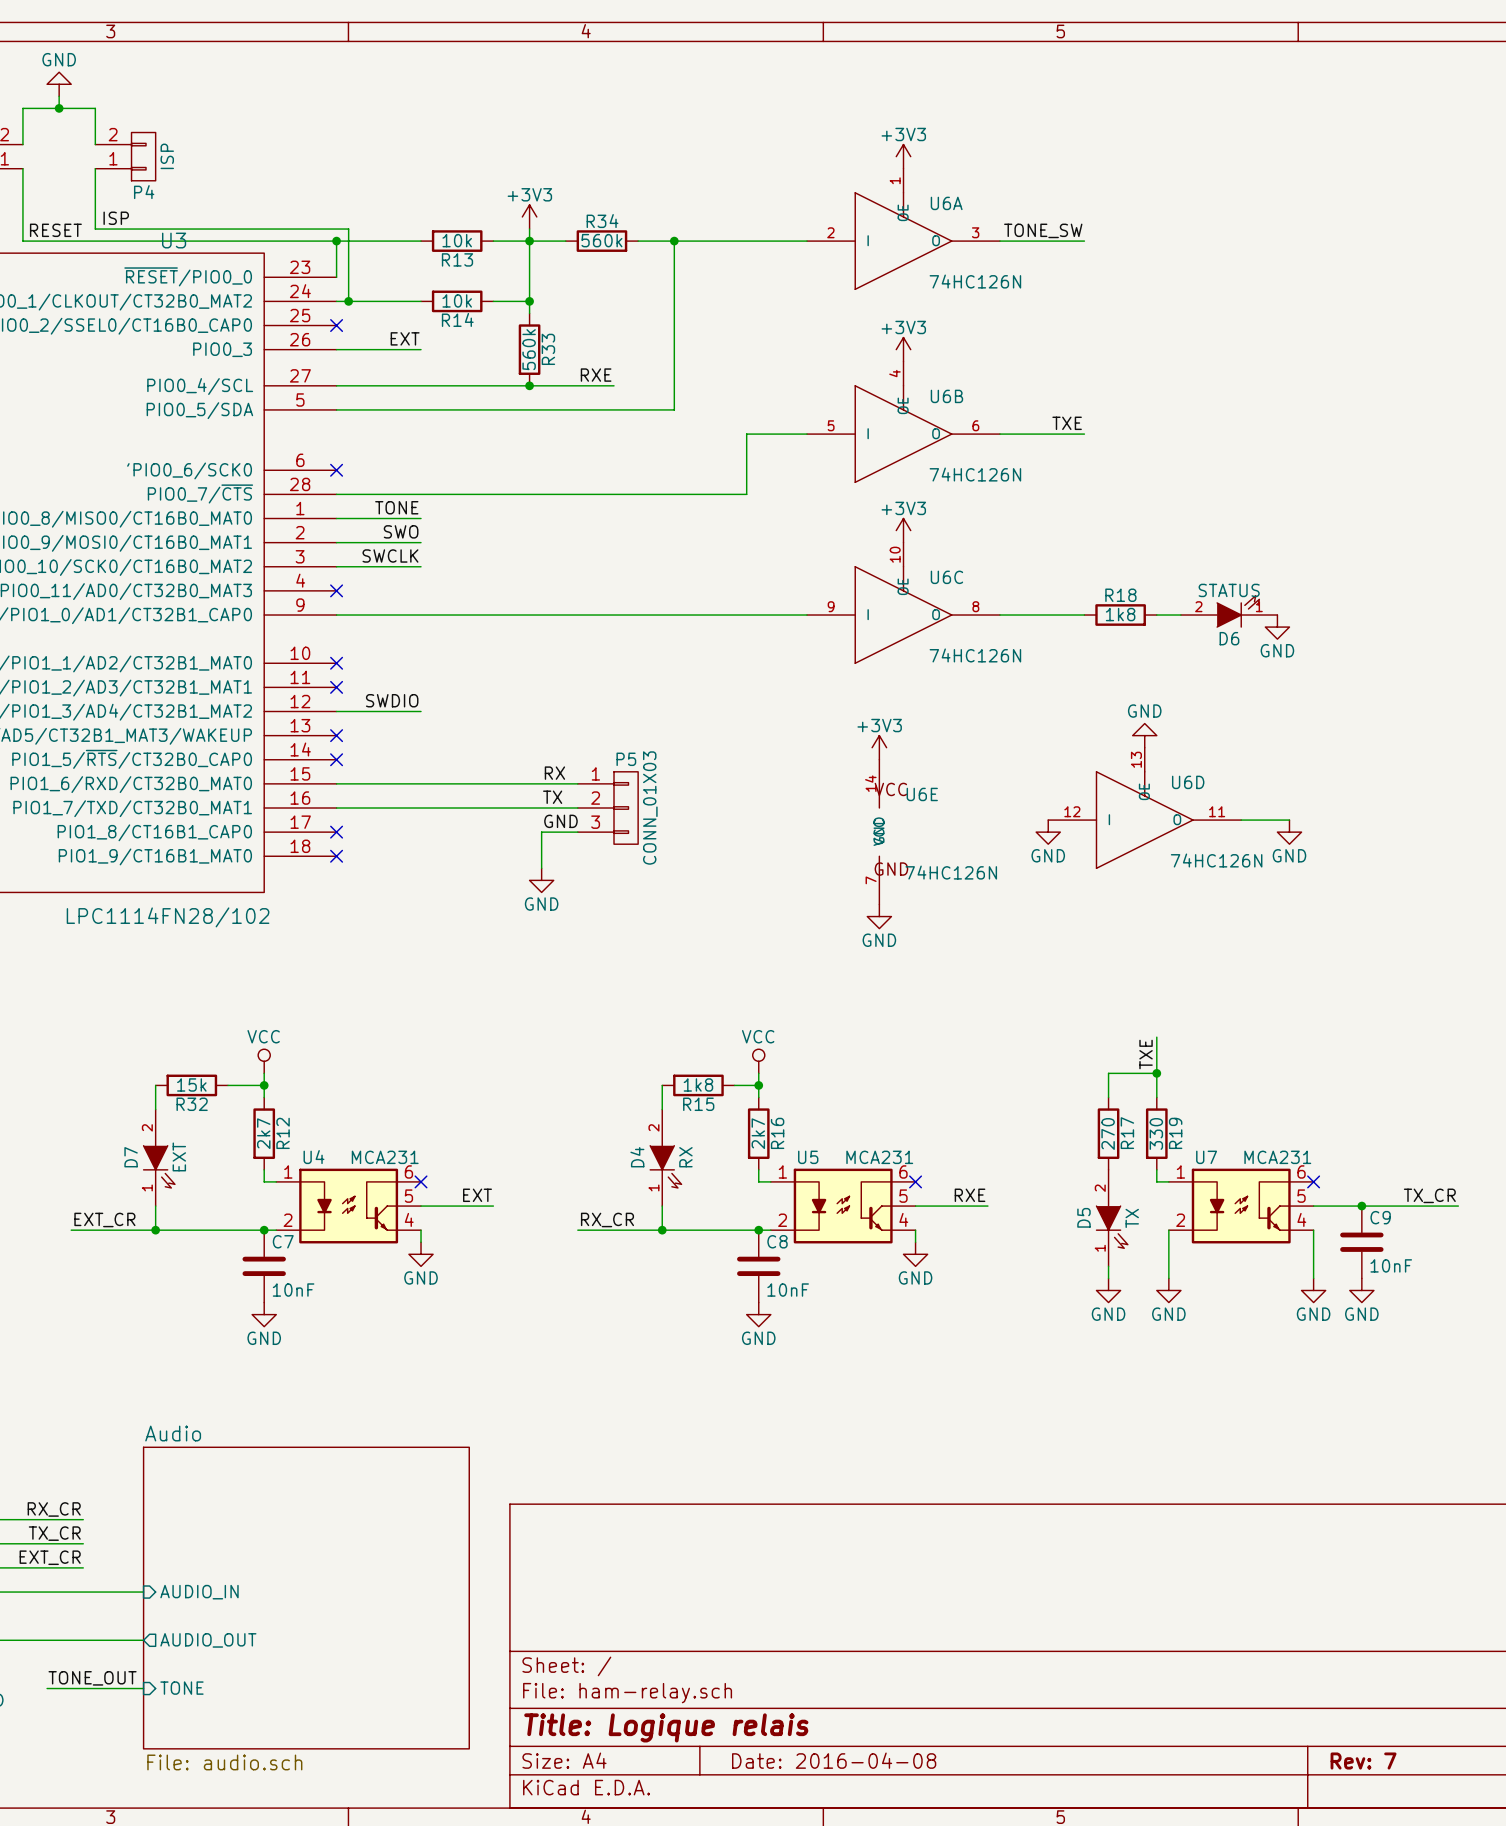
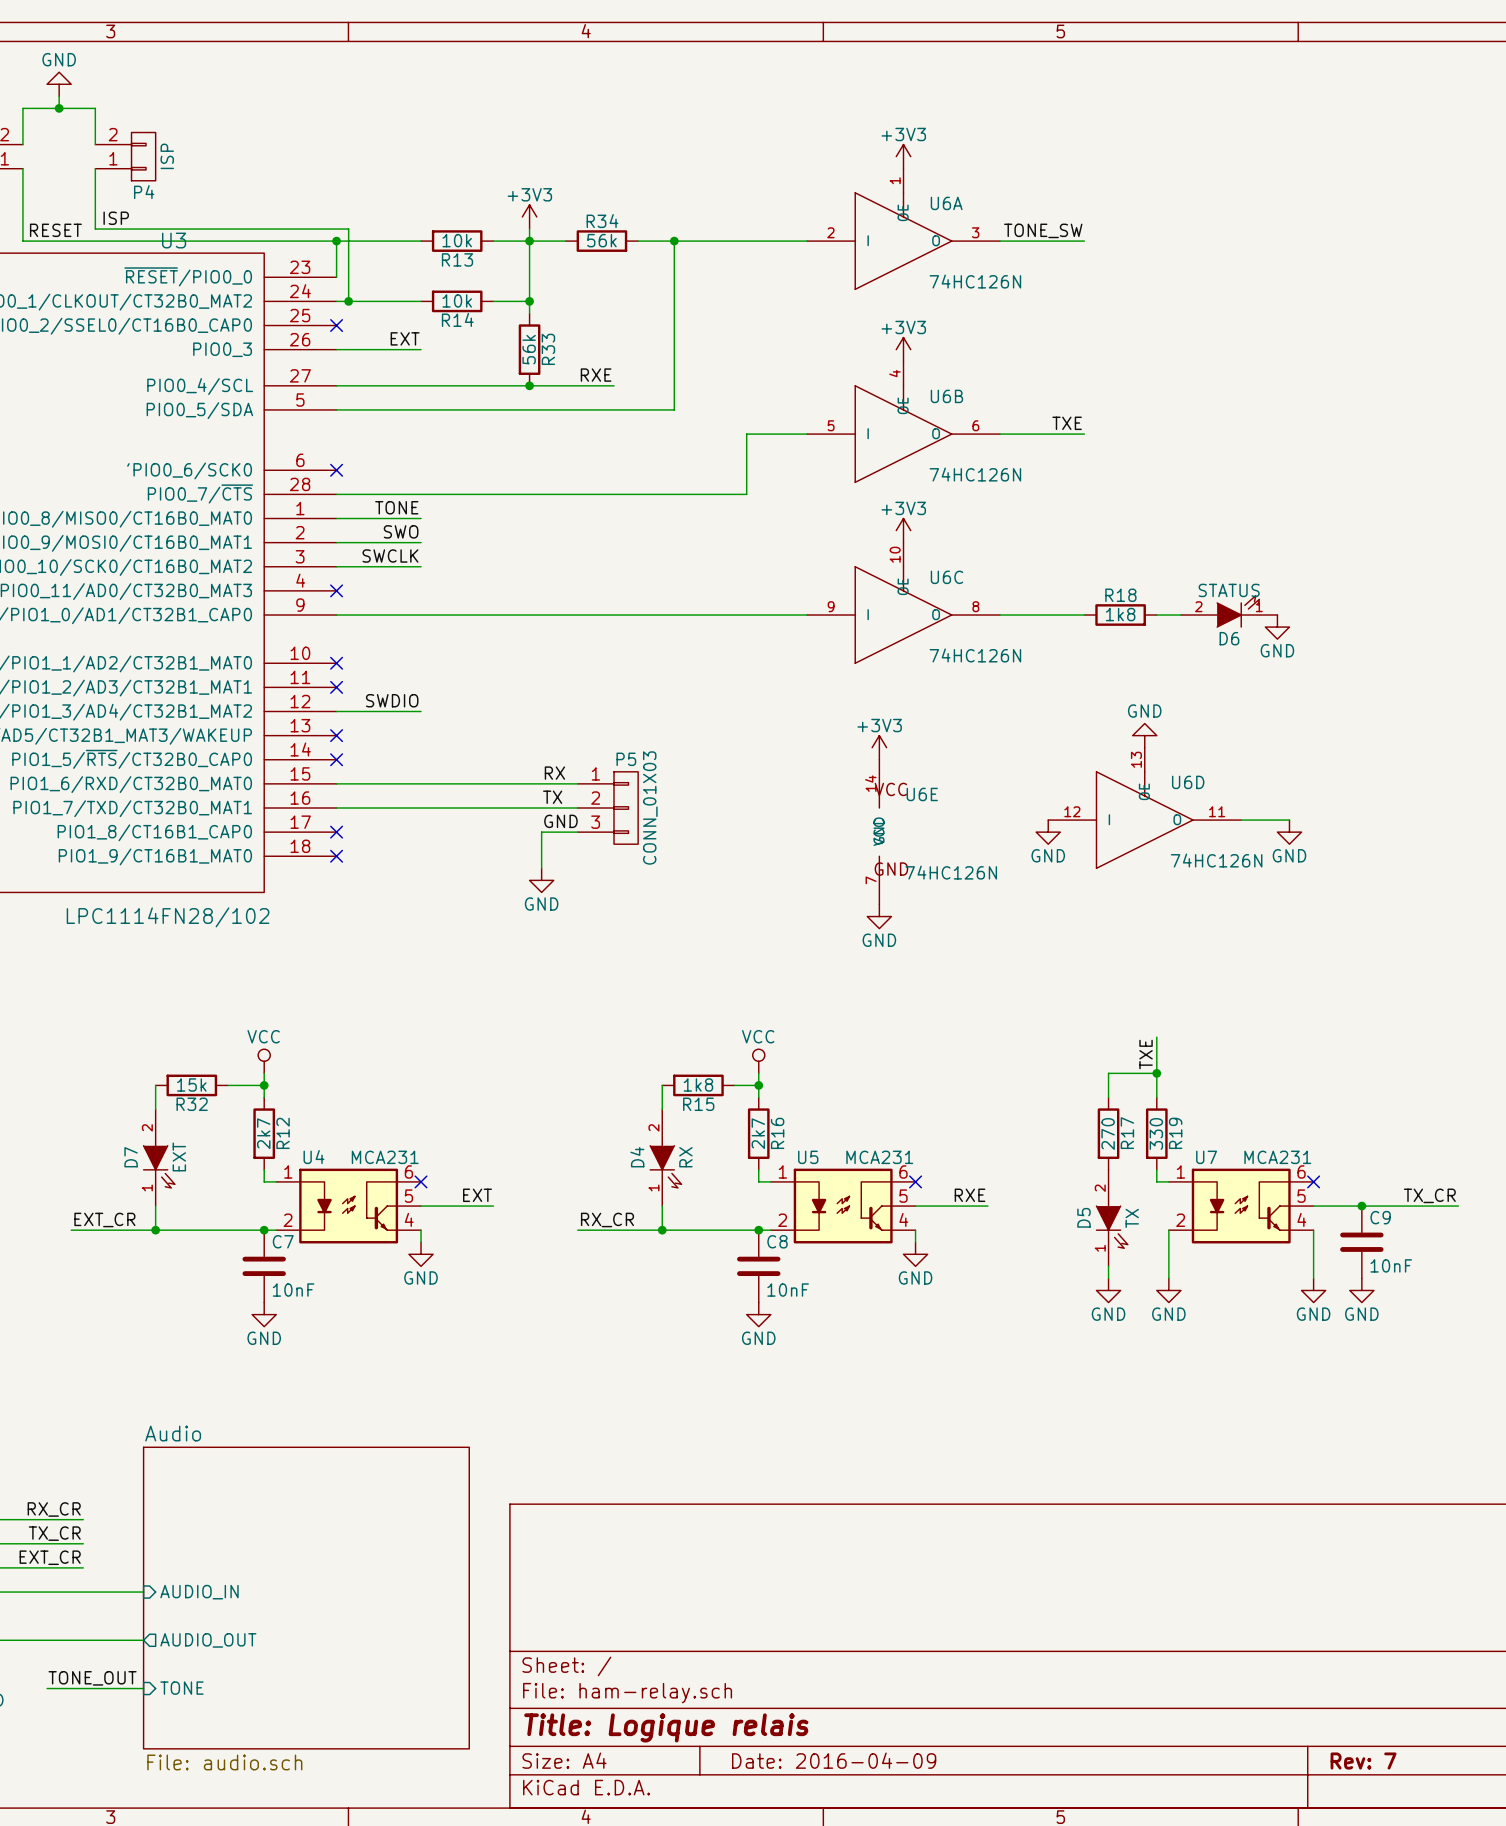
R34 value: 560k (601, 240) -> 56k (601, 240)
R33 value: 560k (529, 349) -> 56k (529, 349)
title block: Date: 2016-04-08 (834, 1760) -> Date: 2016-04-09 (834, 1760)

